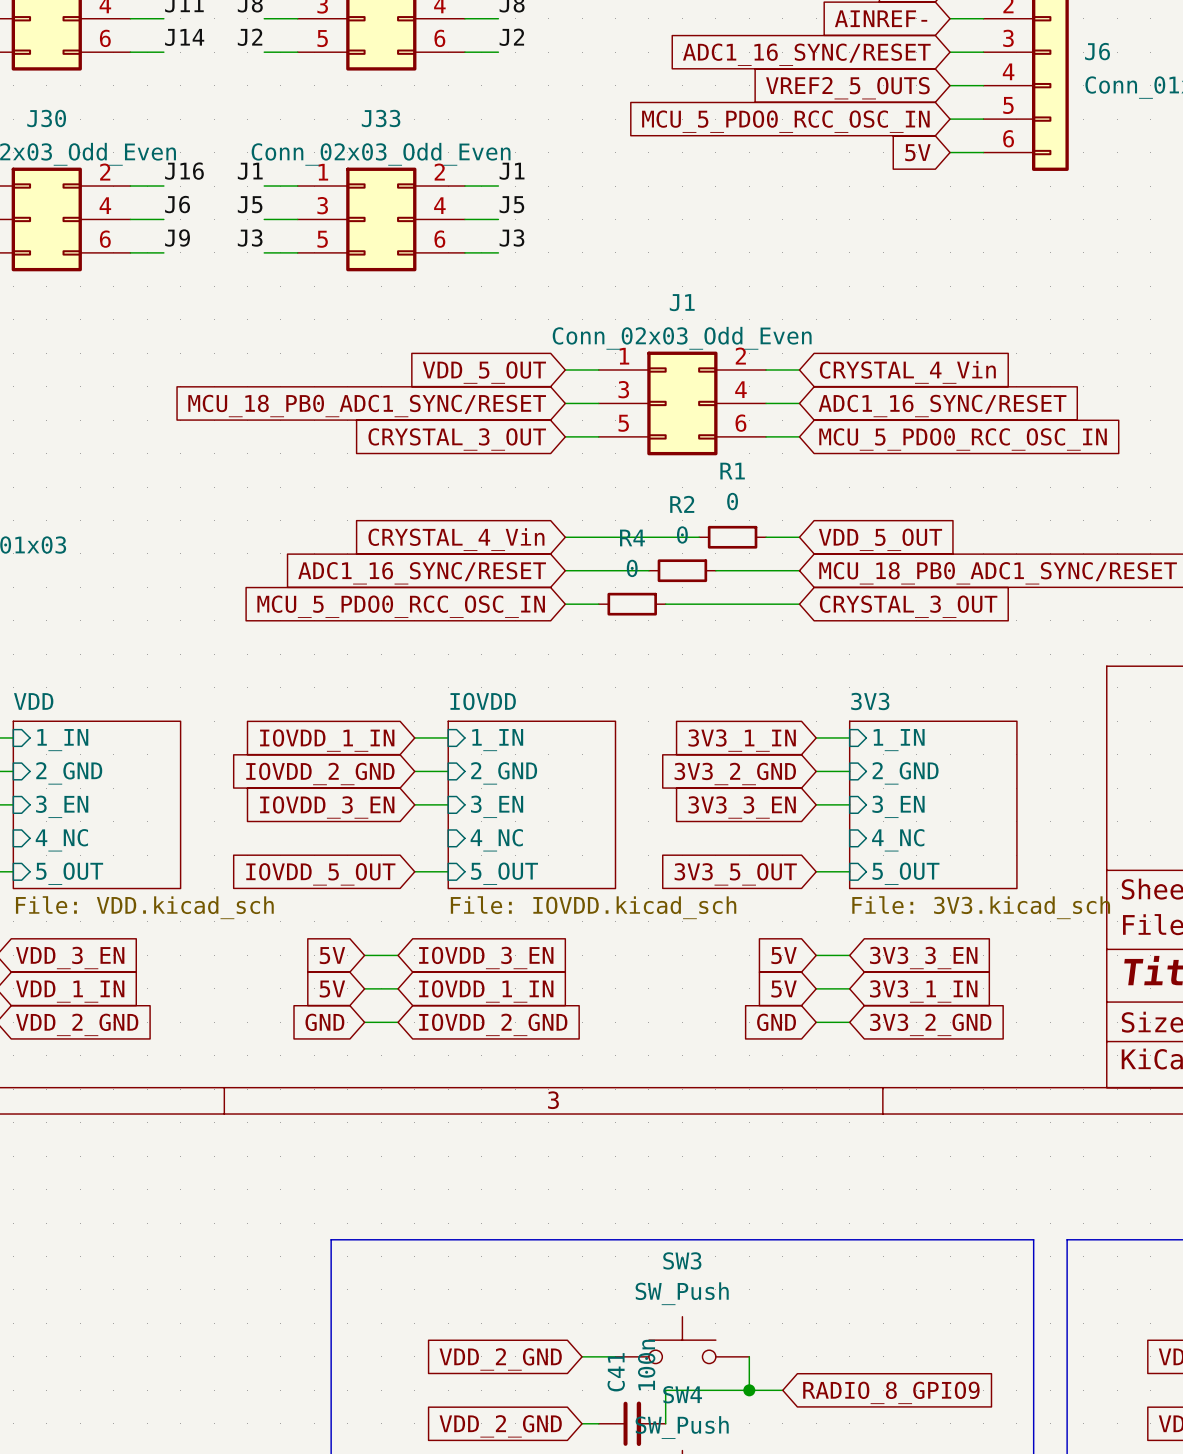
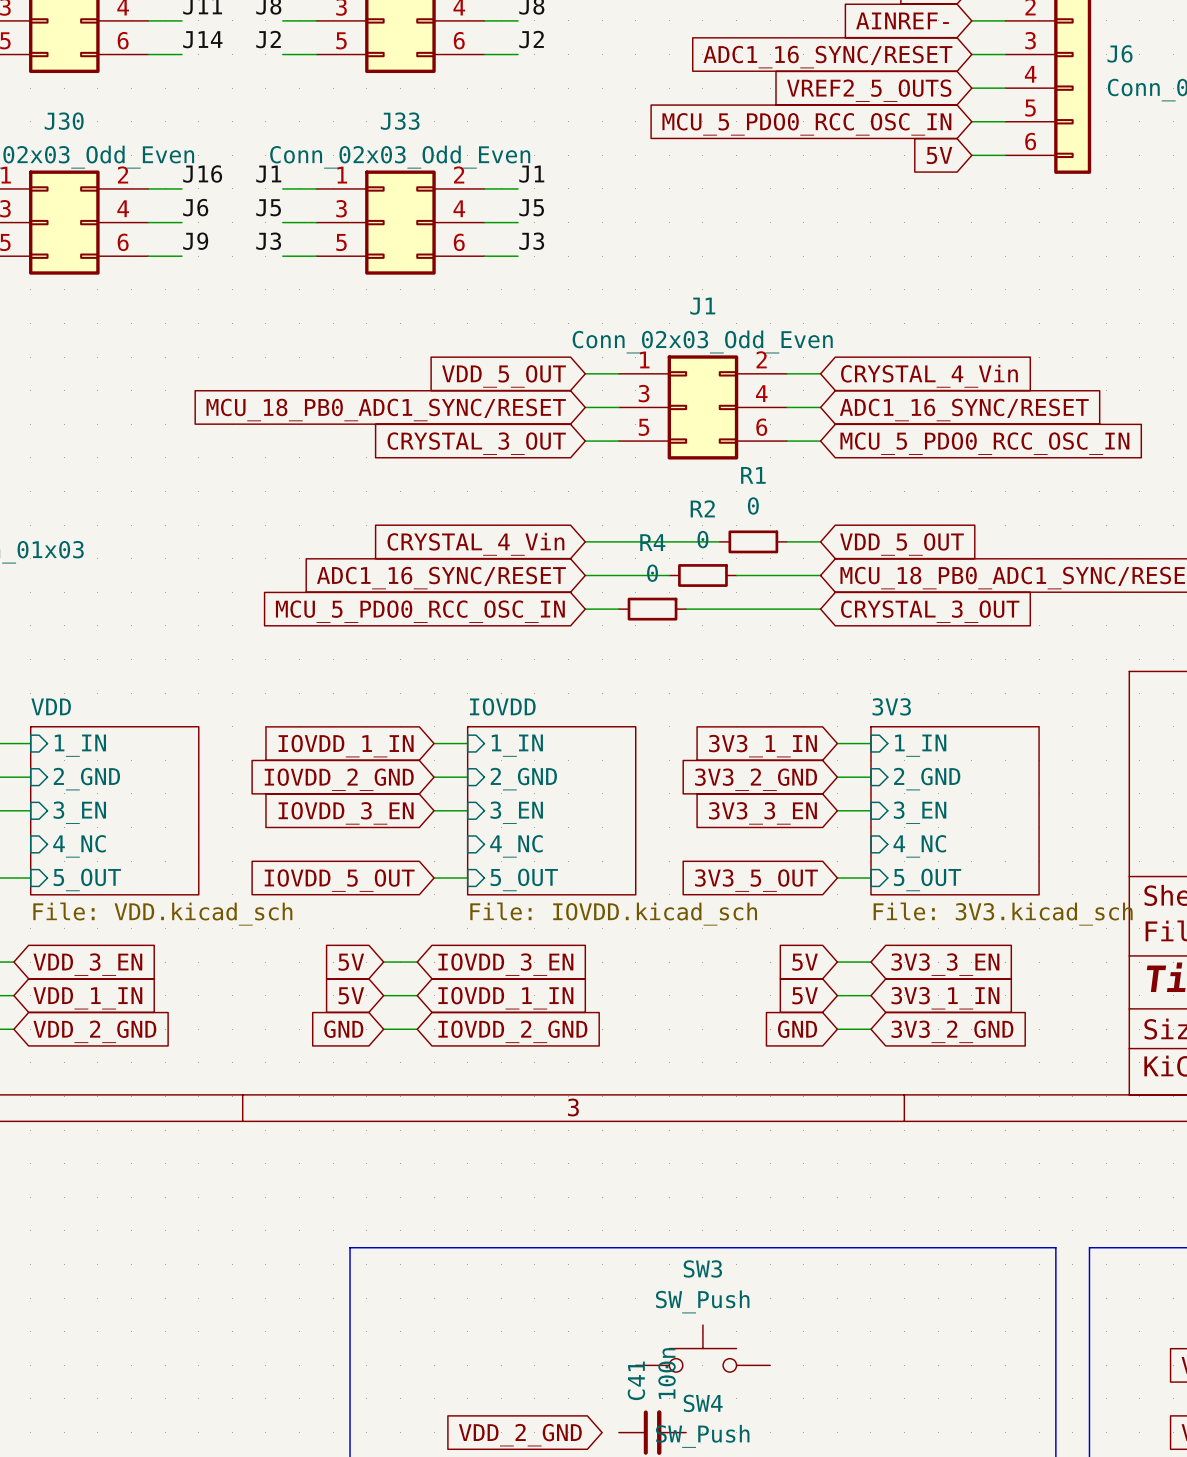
wire: (582, 1356) (615, 1356) -> none
wire: (749, 1356) (749, 1390) -> none
global label: VDD_2_GND (500, 1359) -> none
junction: (749, 1390) -> none
wire: (782, 1390) (665, 1390) (665, 1423) -> none
global label: RADIO_8_GPIO9 (891, 1392) -> none
wire: (582, 1423) (598, 1423) -> none

